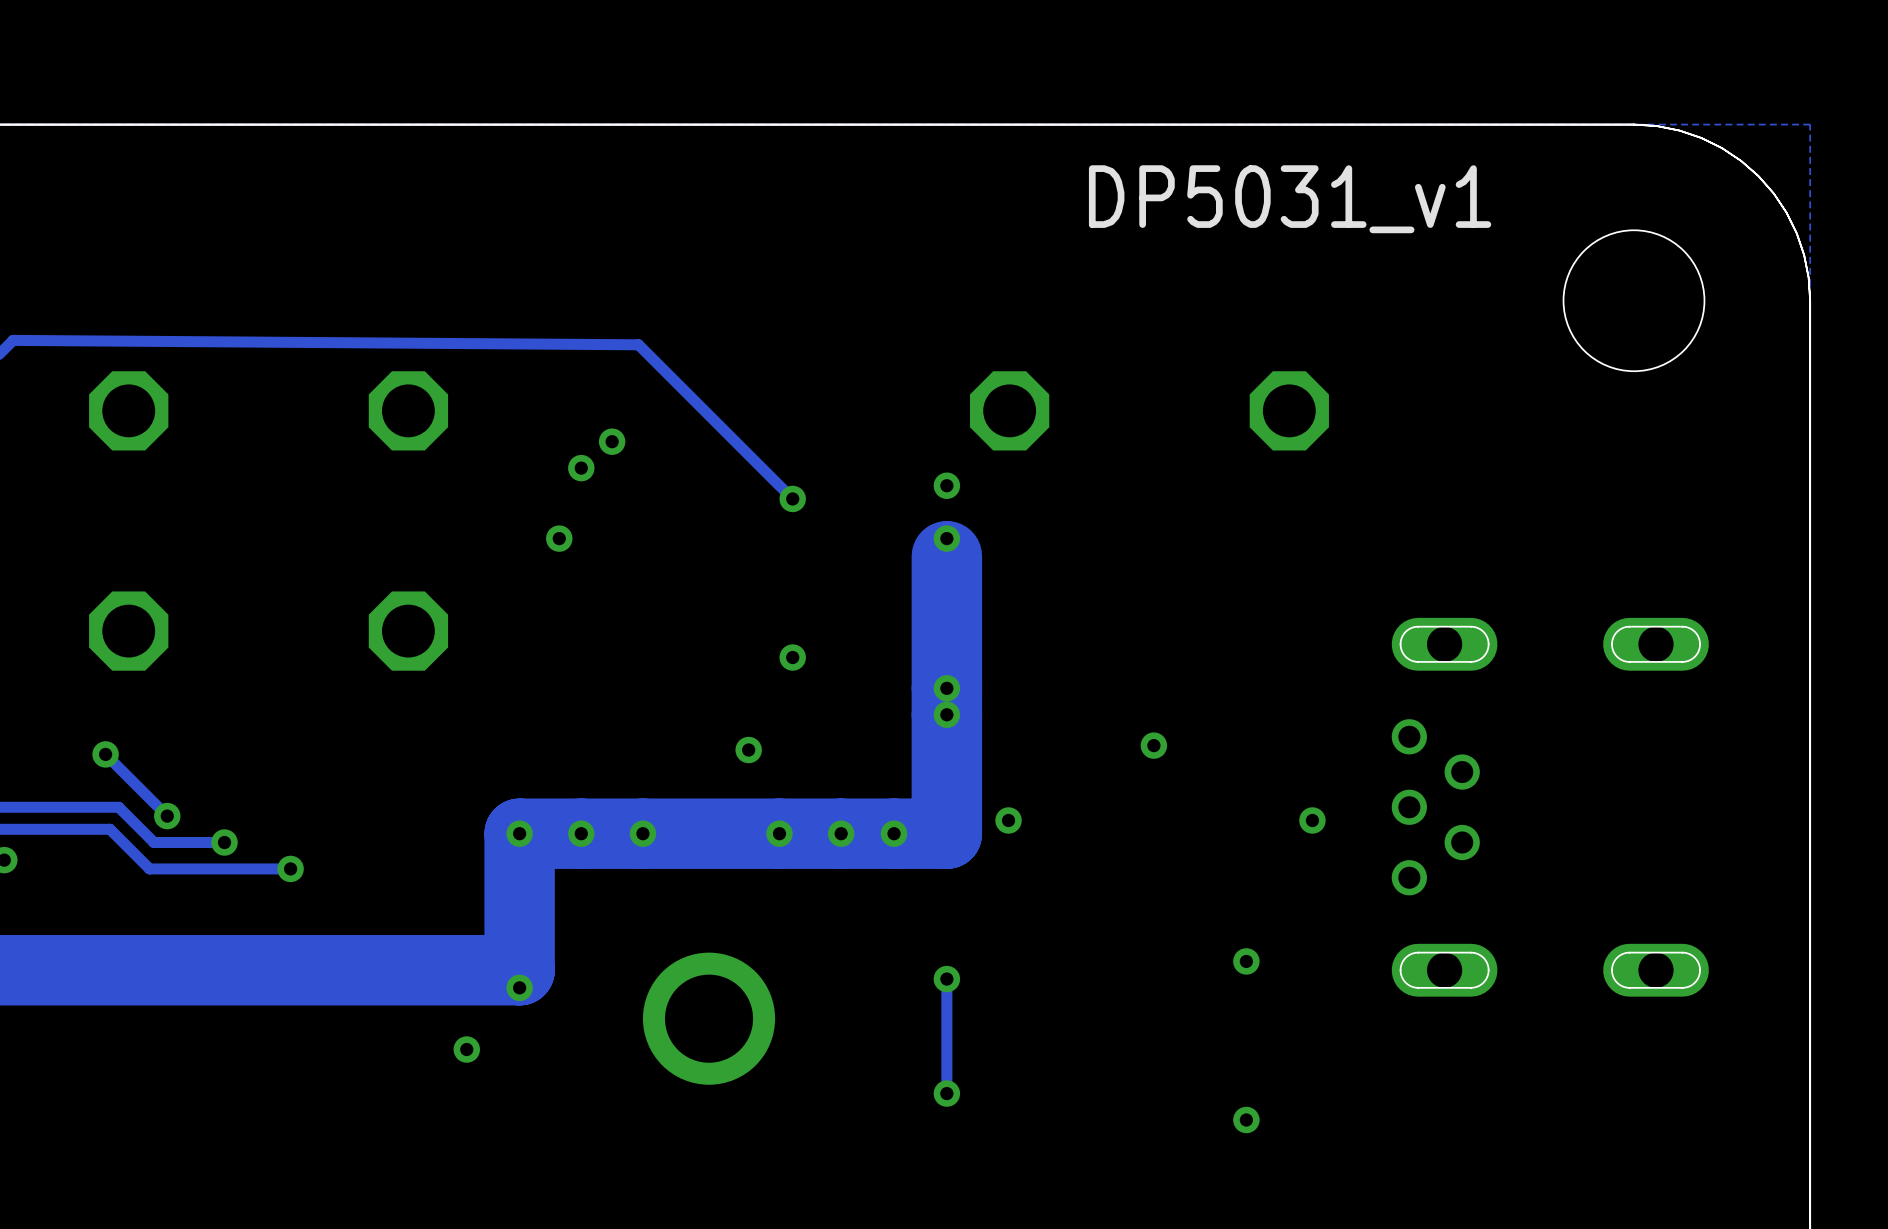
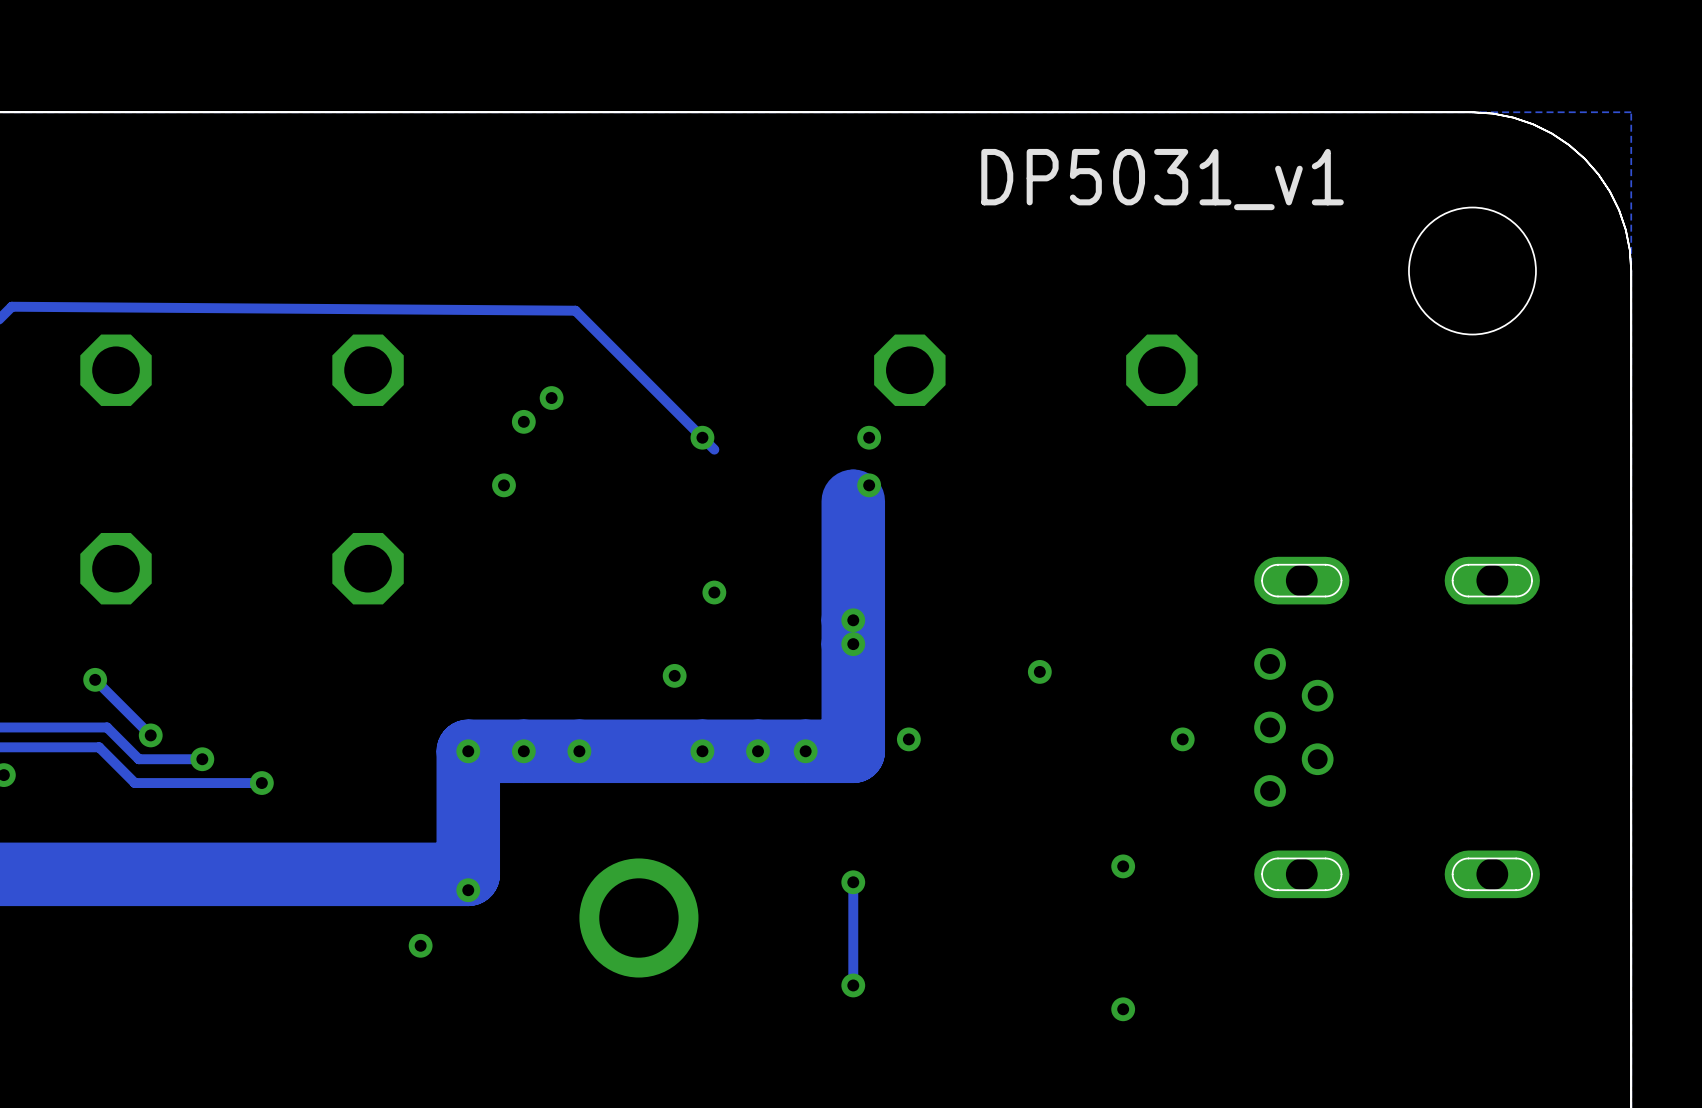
via position: (946, 485) -> (869, 437)
via position: (792, 498) -> (702, 437)
via position: (946, 538) -> (869, 485)

